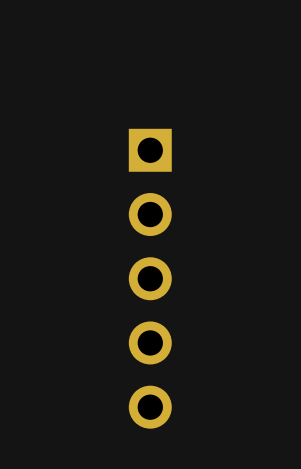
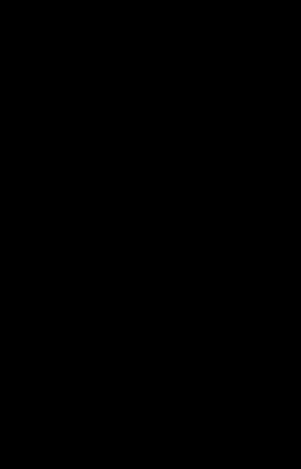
part: (150, 278) -> none

